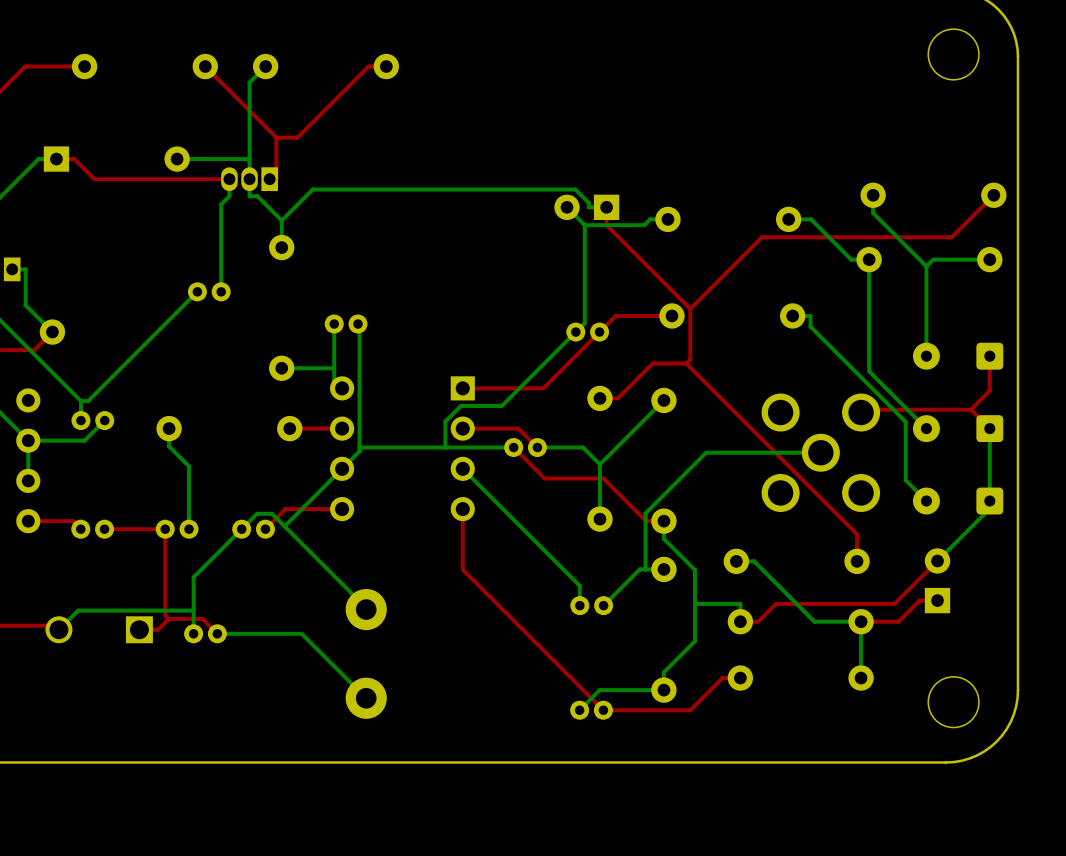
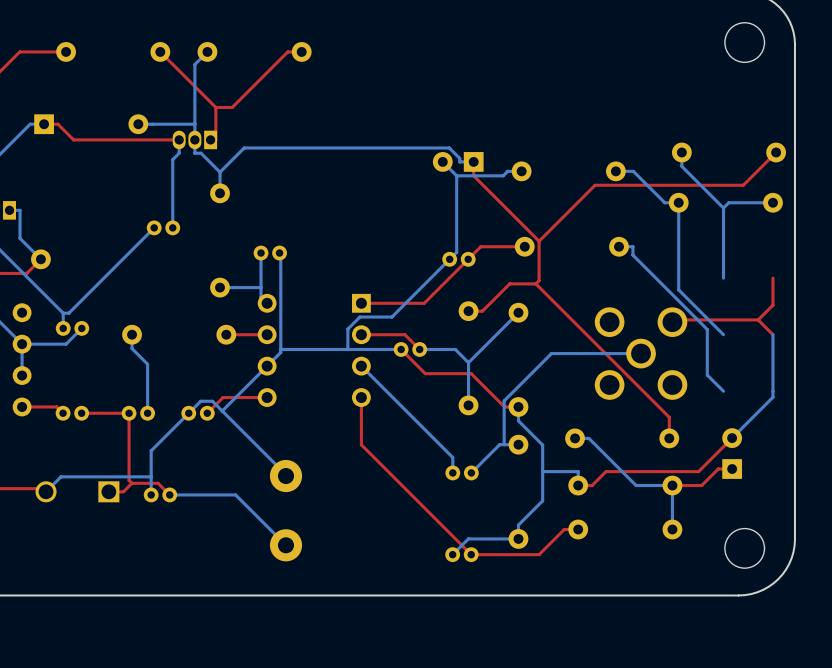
part: (958, 356) -> none
part: (958, 428) -> none
part: (958, 501) -> none

